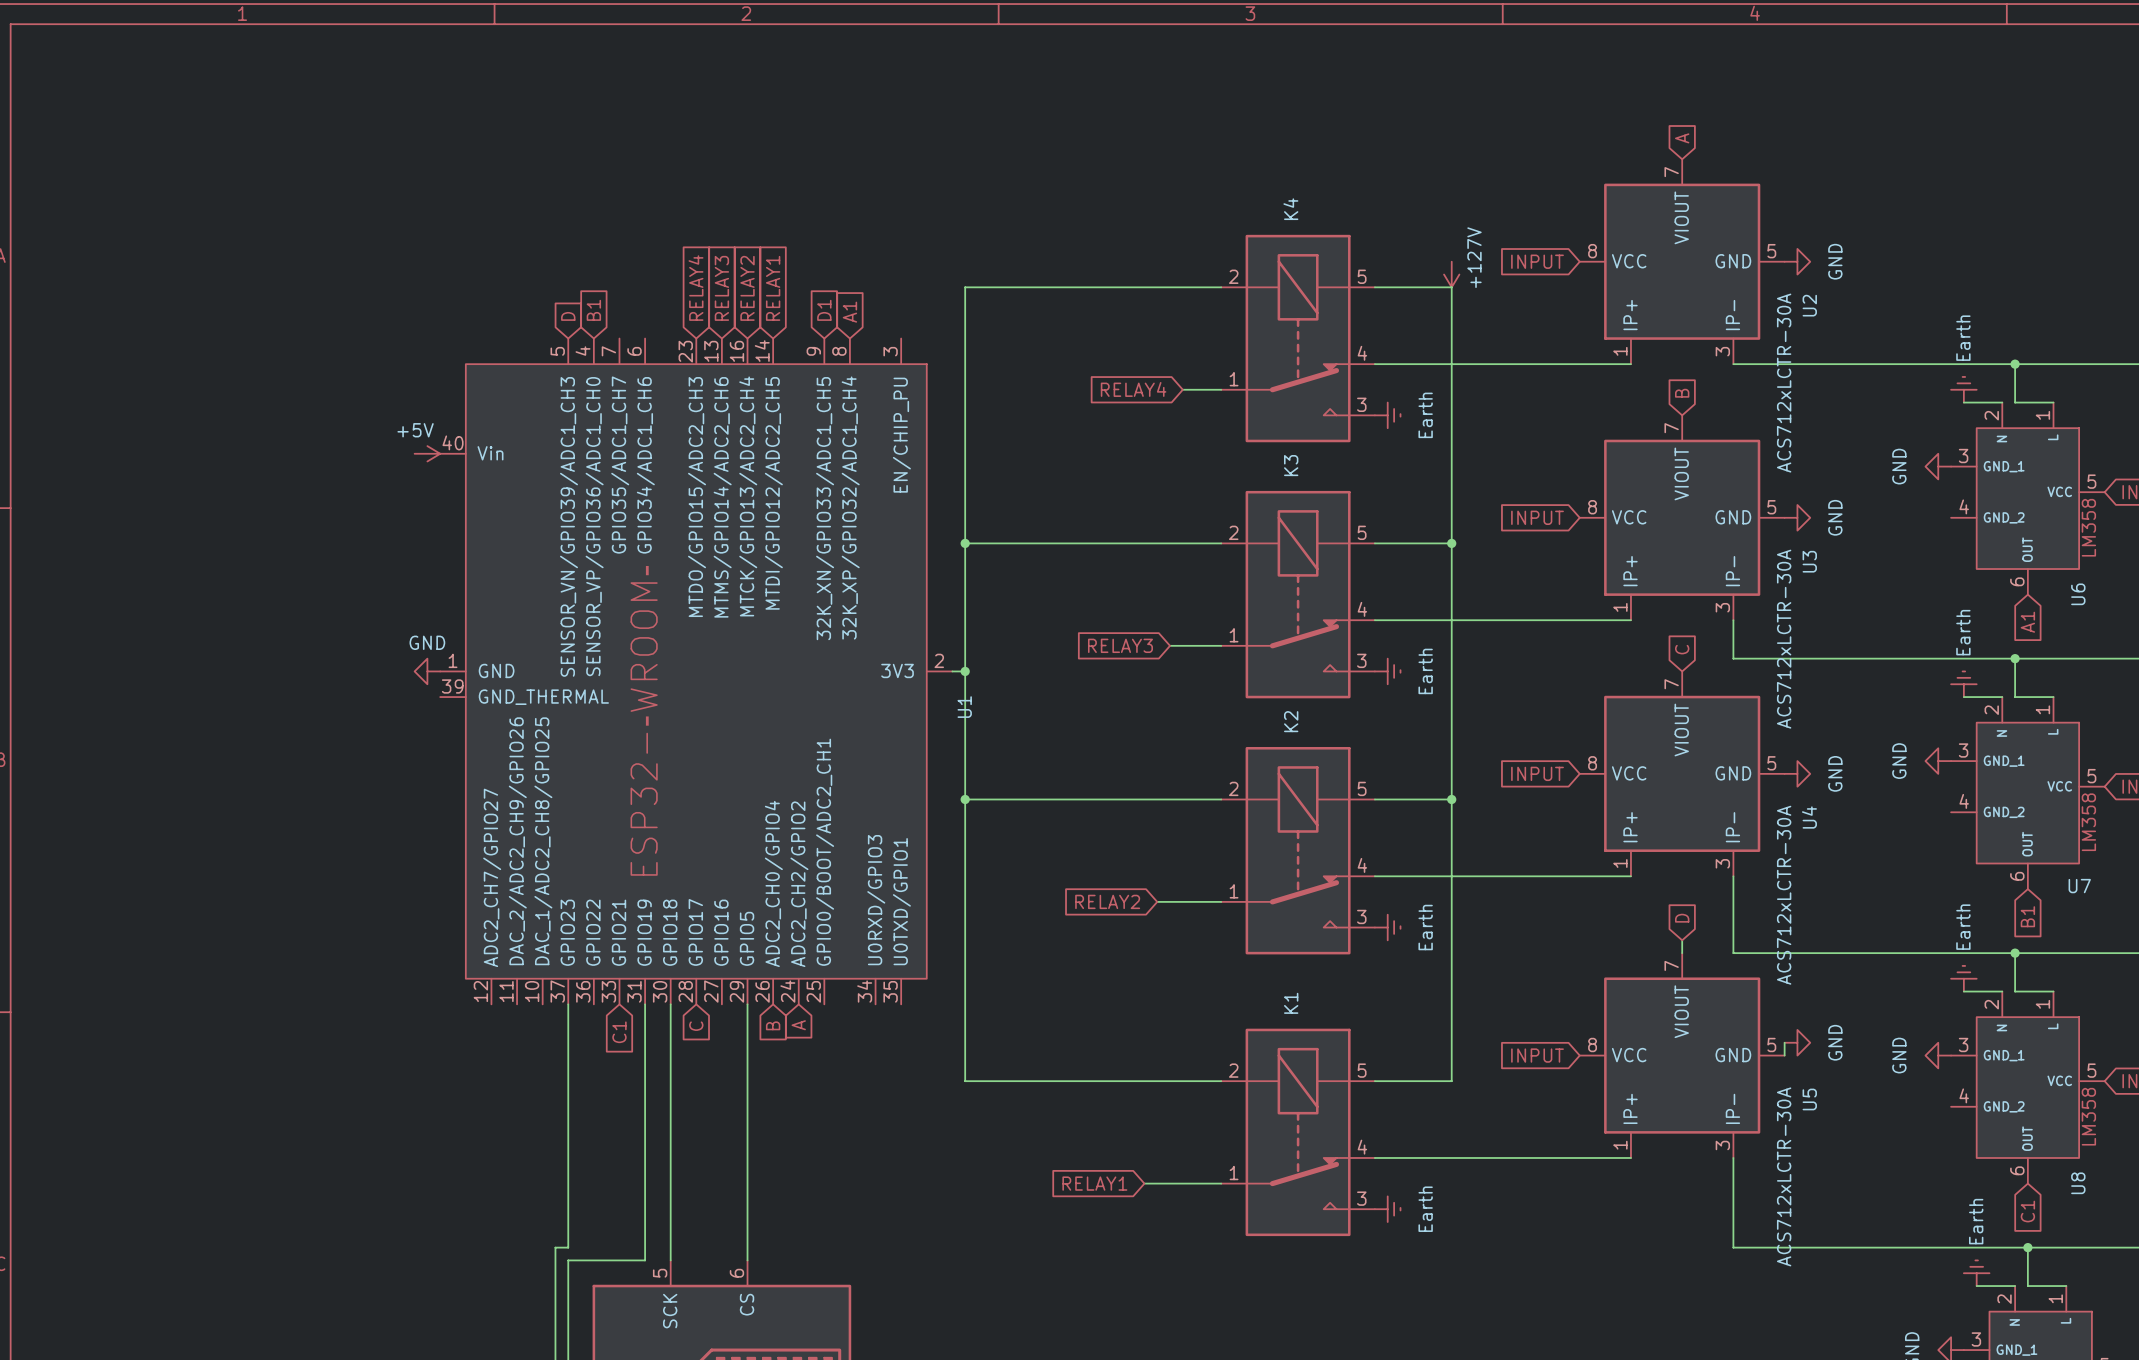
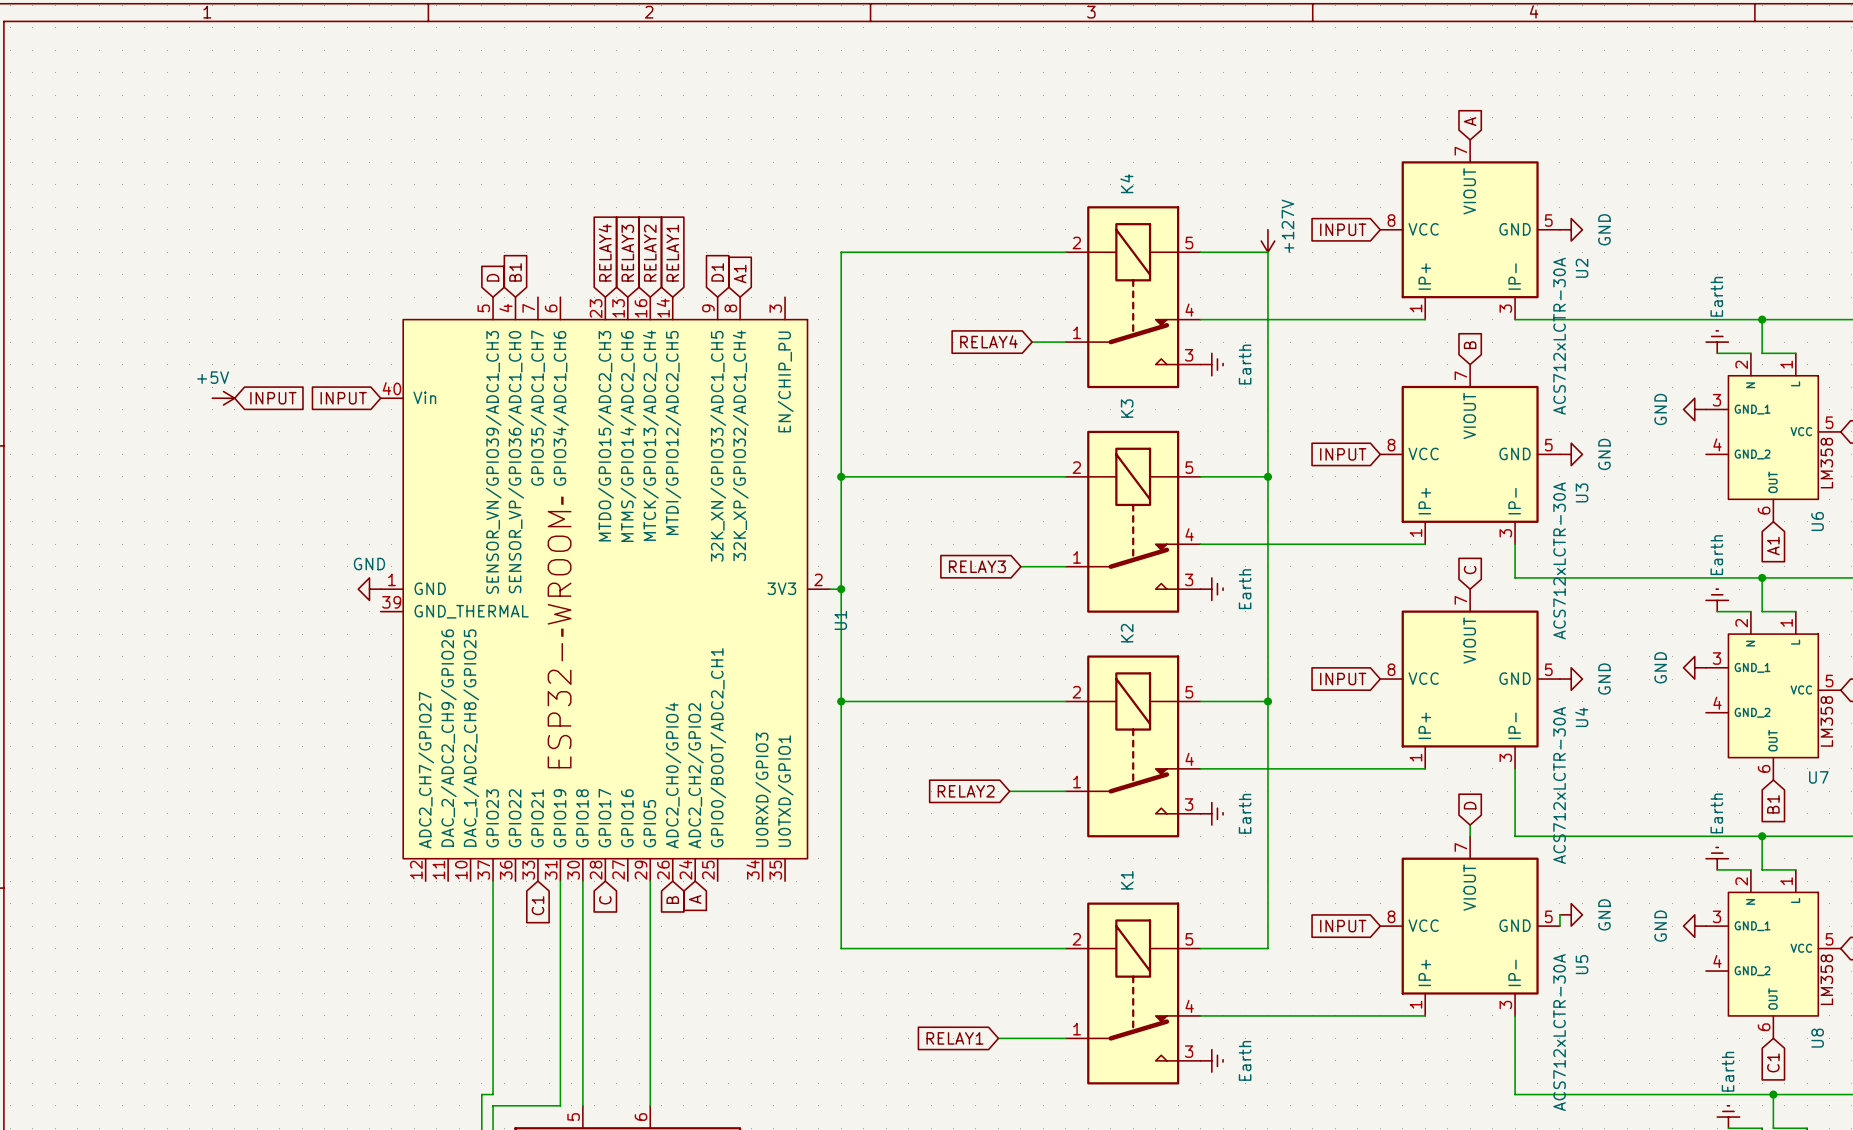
global label: none -> INPUT (273, 398)
global label: none -> INPUT (343, 398)
power symbol position: +5V (427, 453) -> +5V (223, 398)

